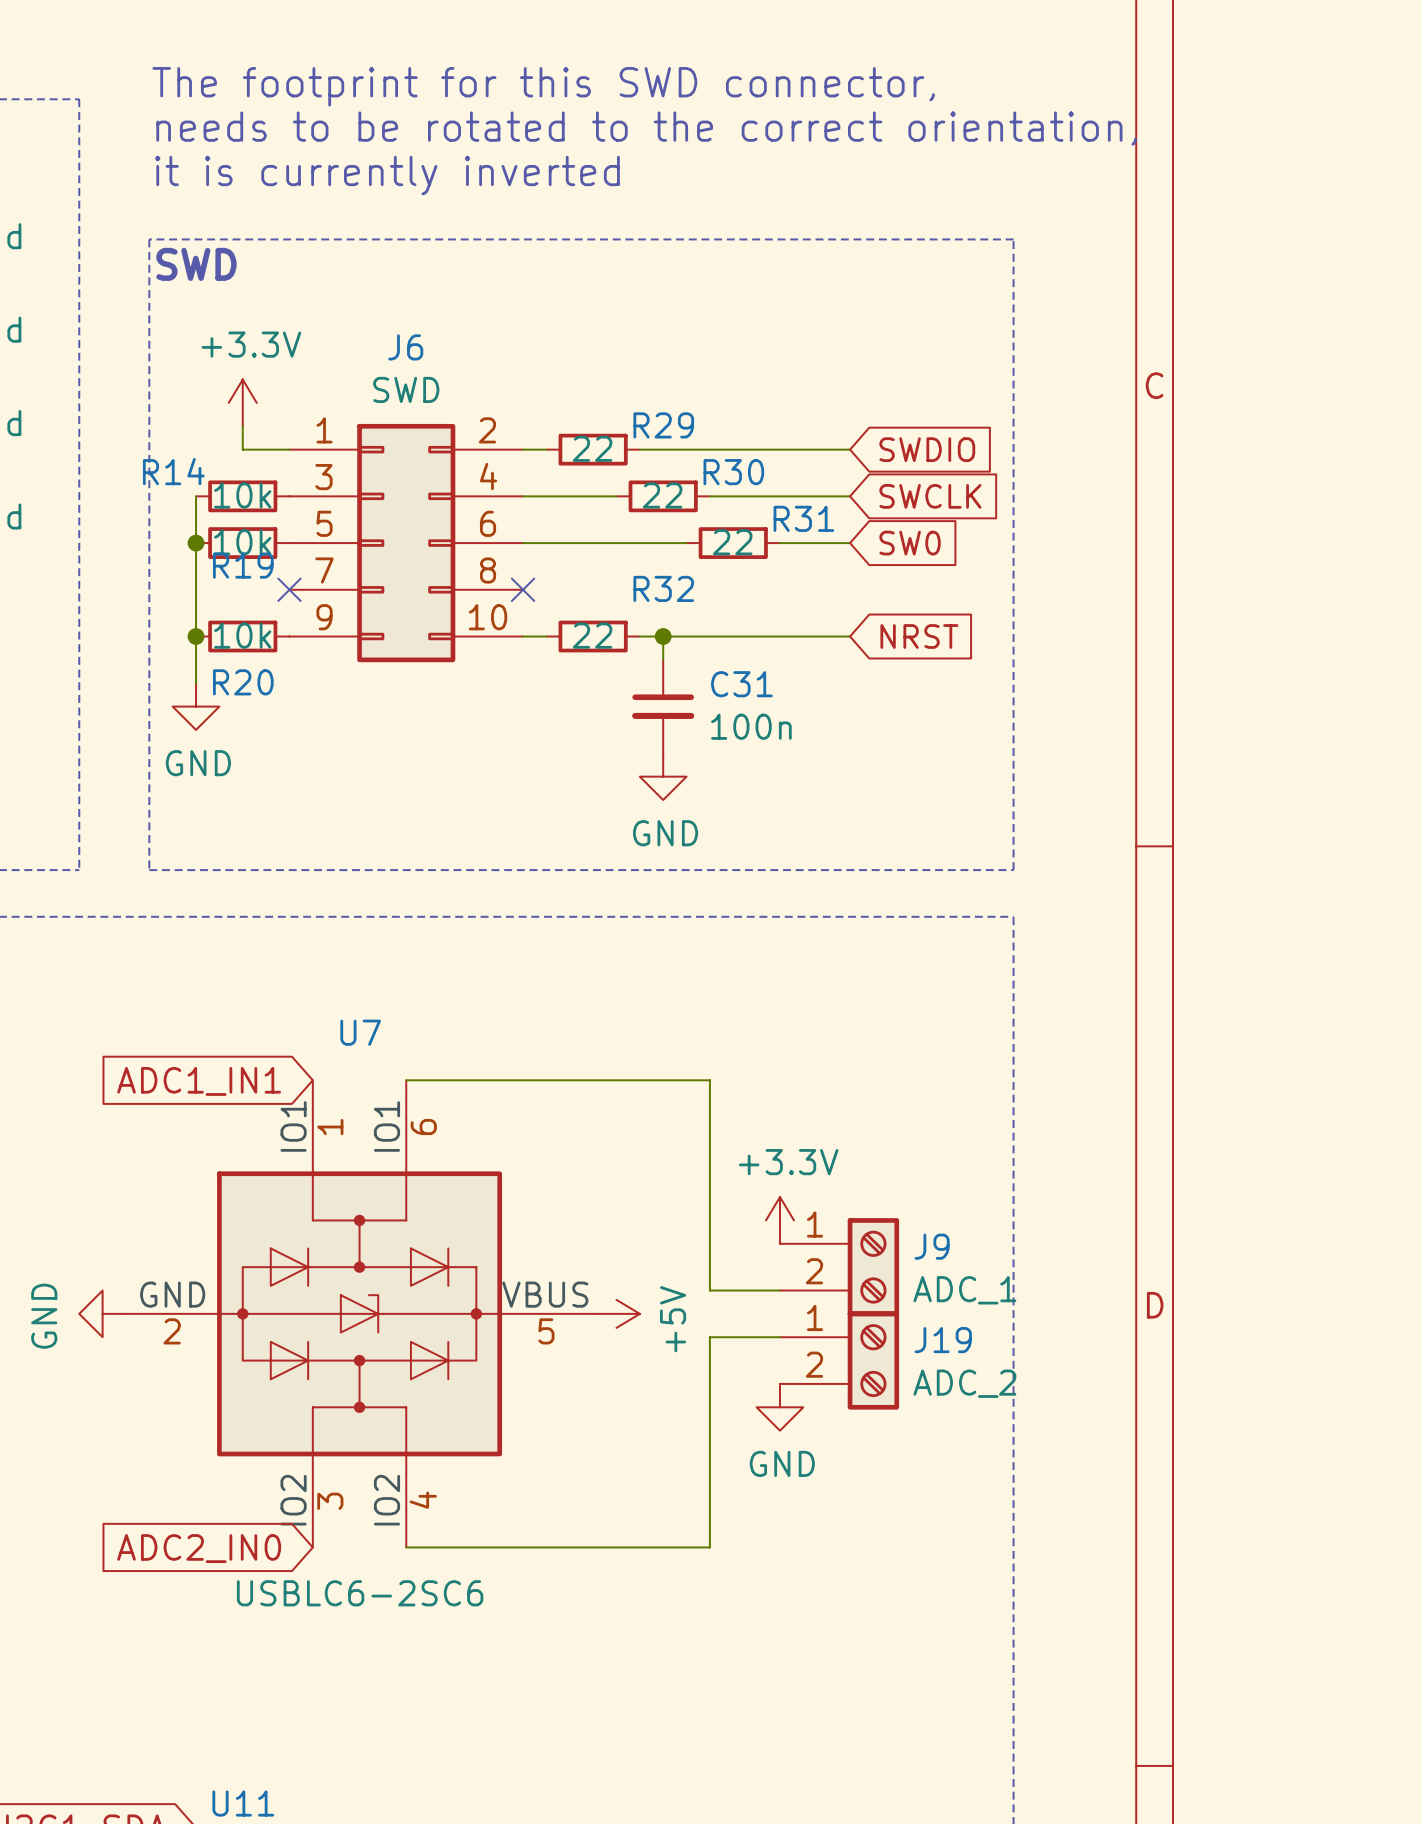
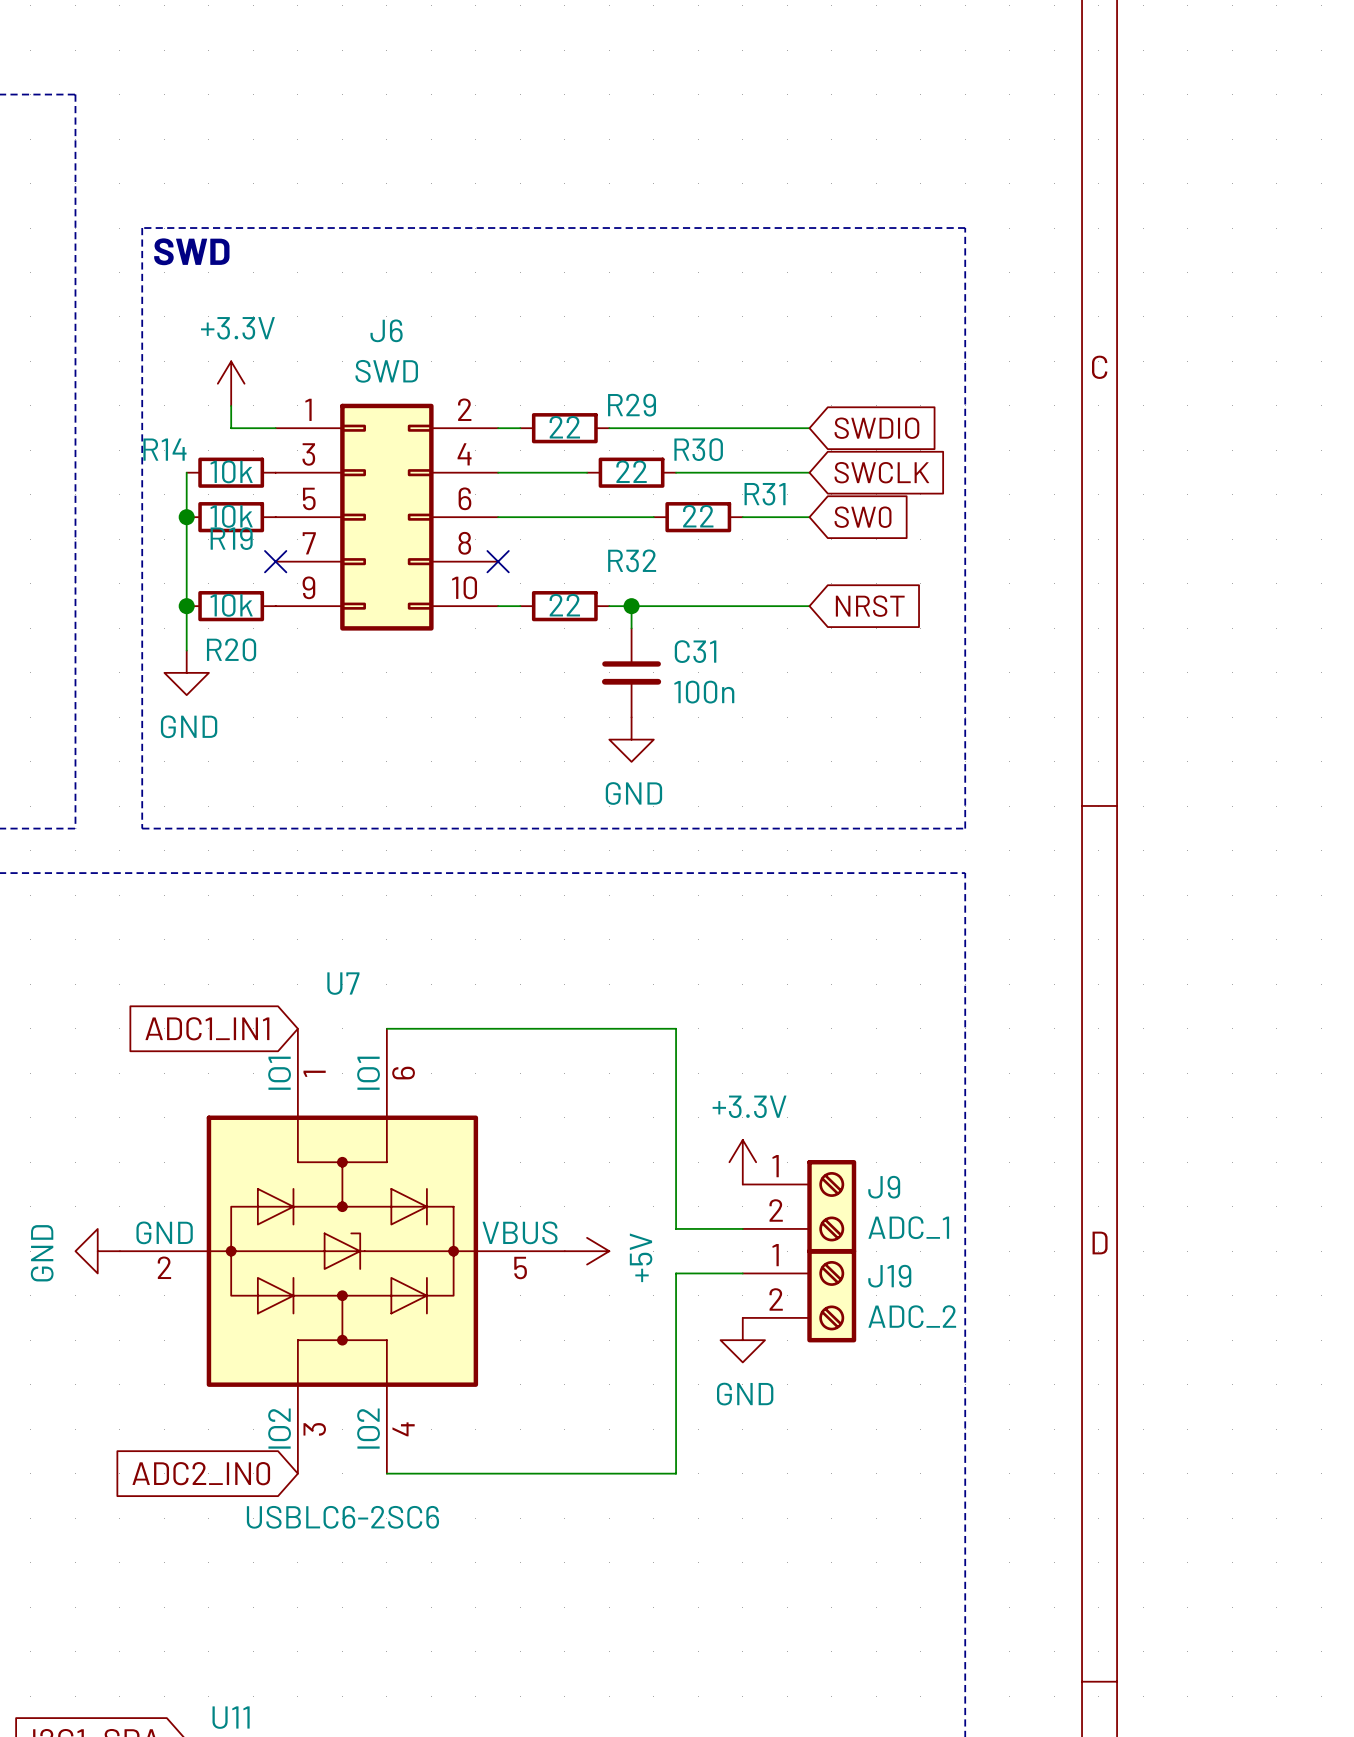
text: The footprint for this SWD connector, (543, 86) -> none
text: needs to be rotated to the correct orientation, (646, 128) -> none
text: it is currently inverted (387, 175) -> none

